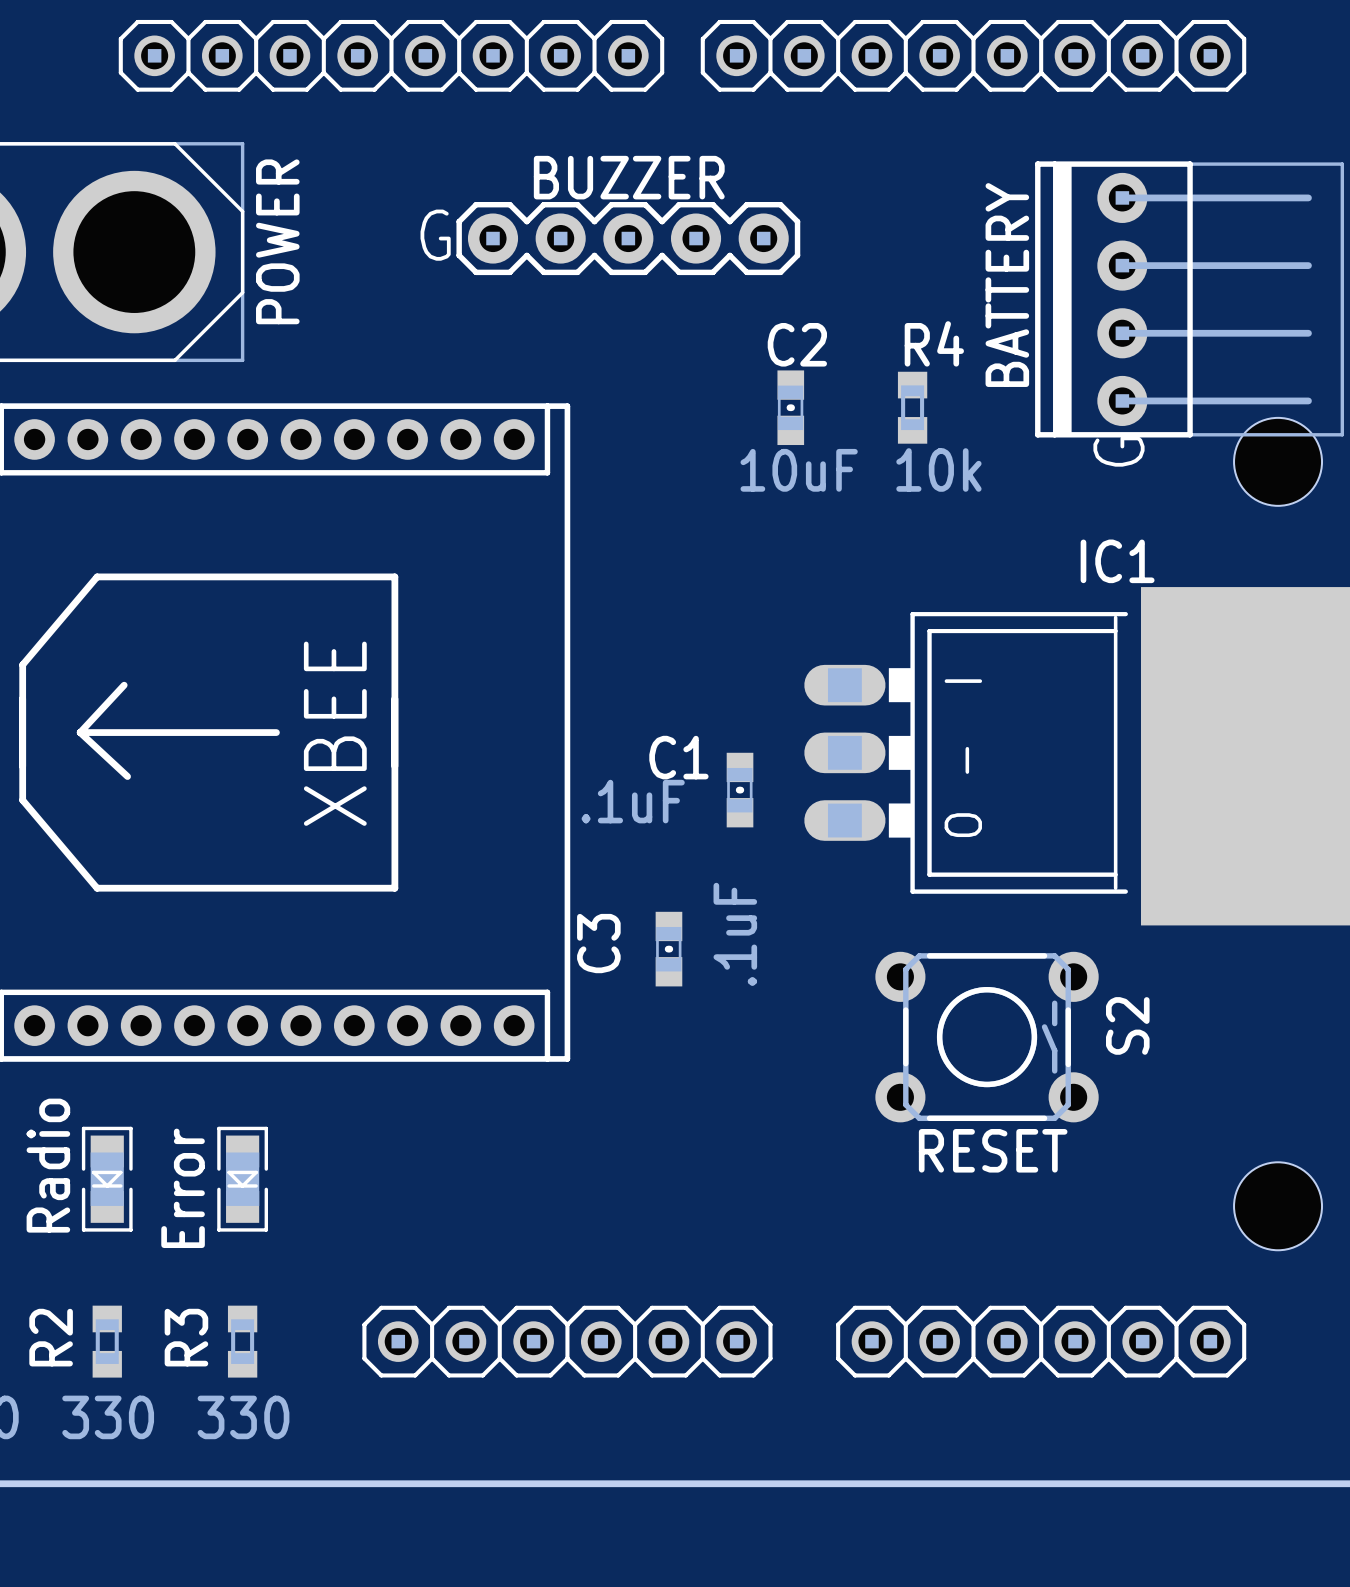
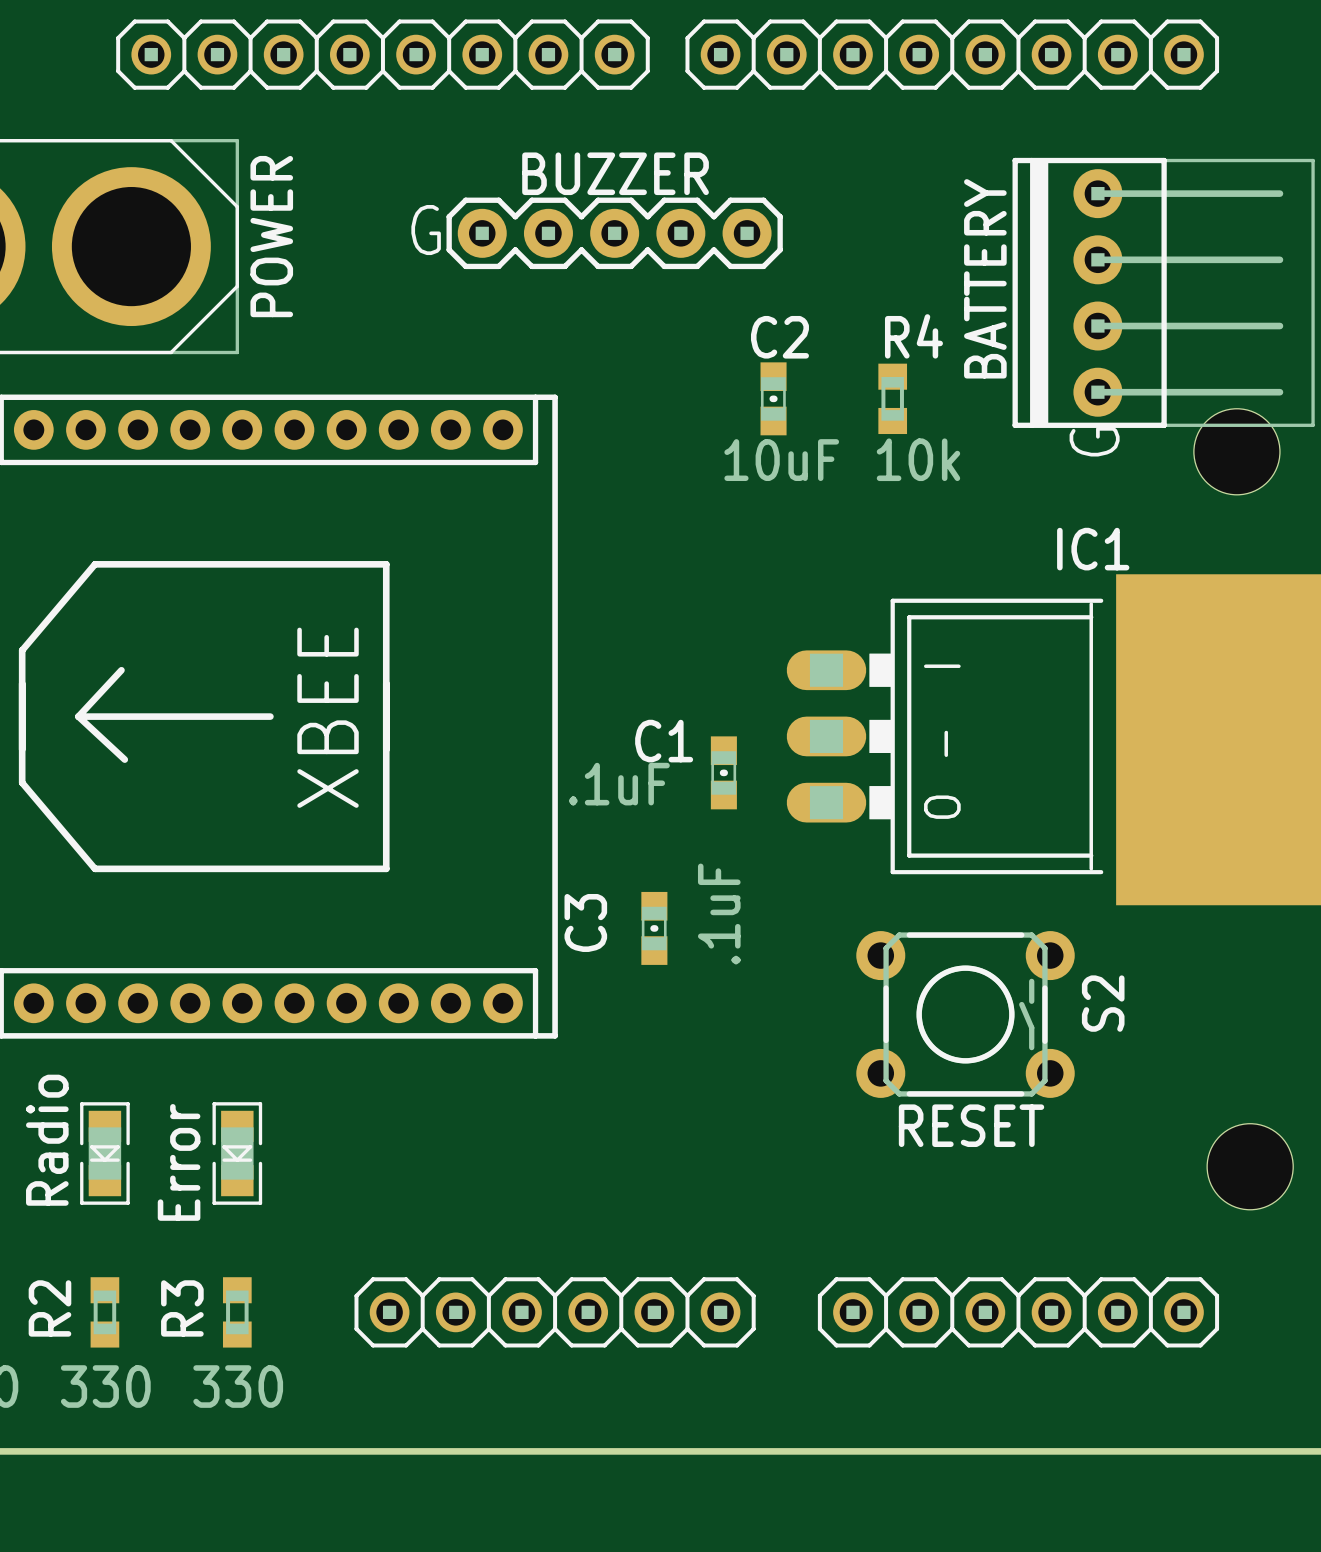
part position: (1278, 461) -> (1236, 451)
part position: (1278, 1206) -> (1250, 1166)

